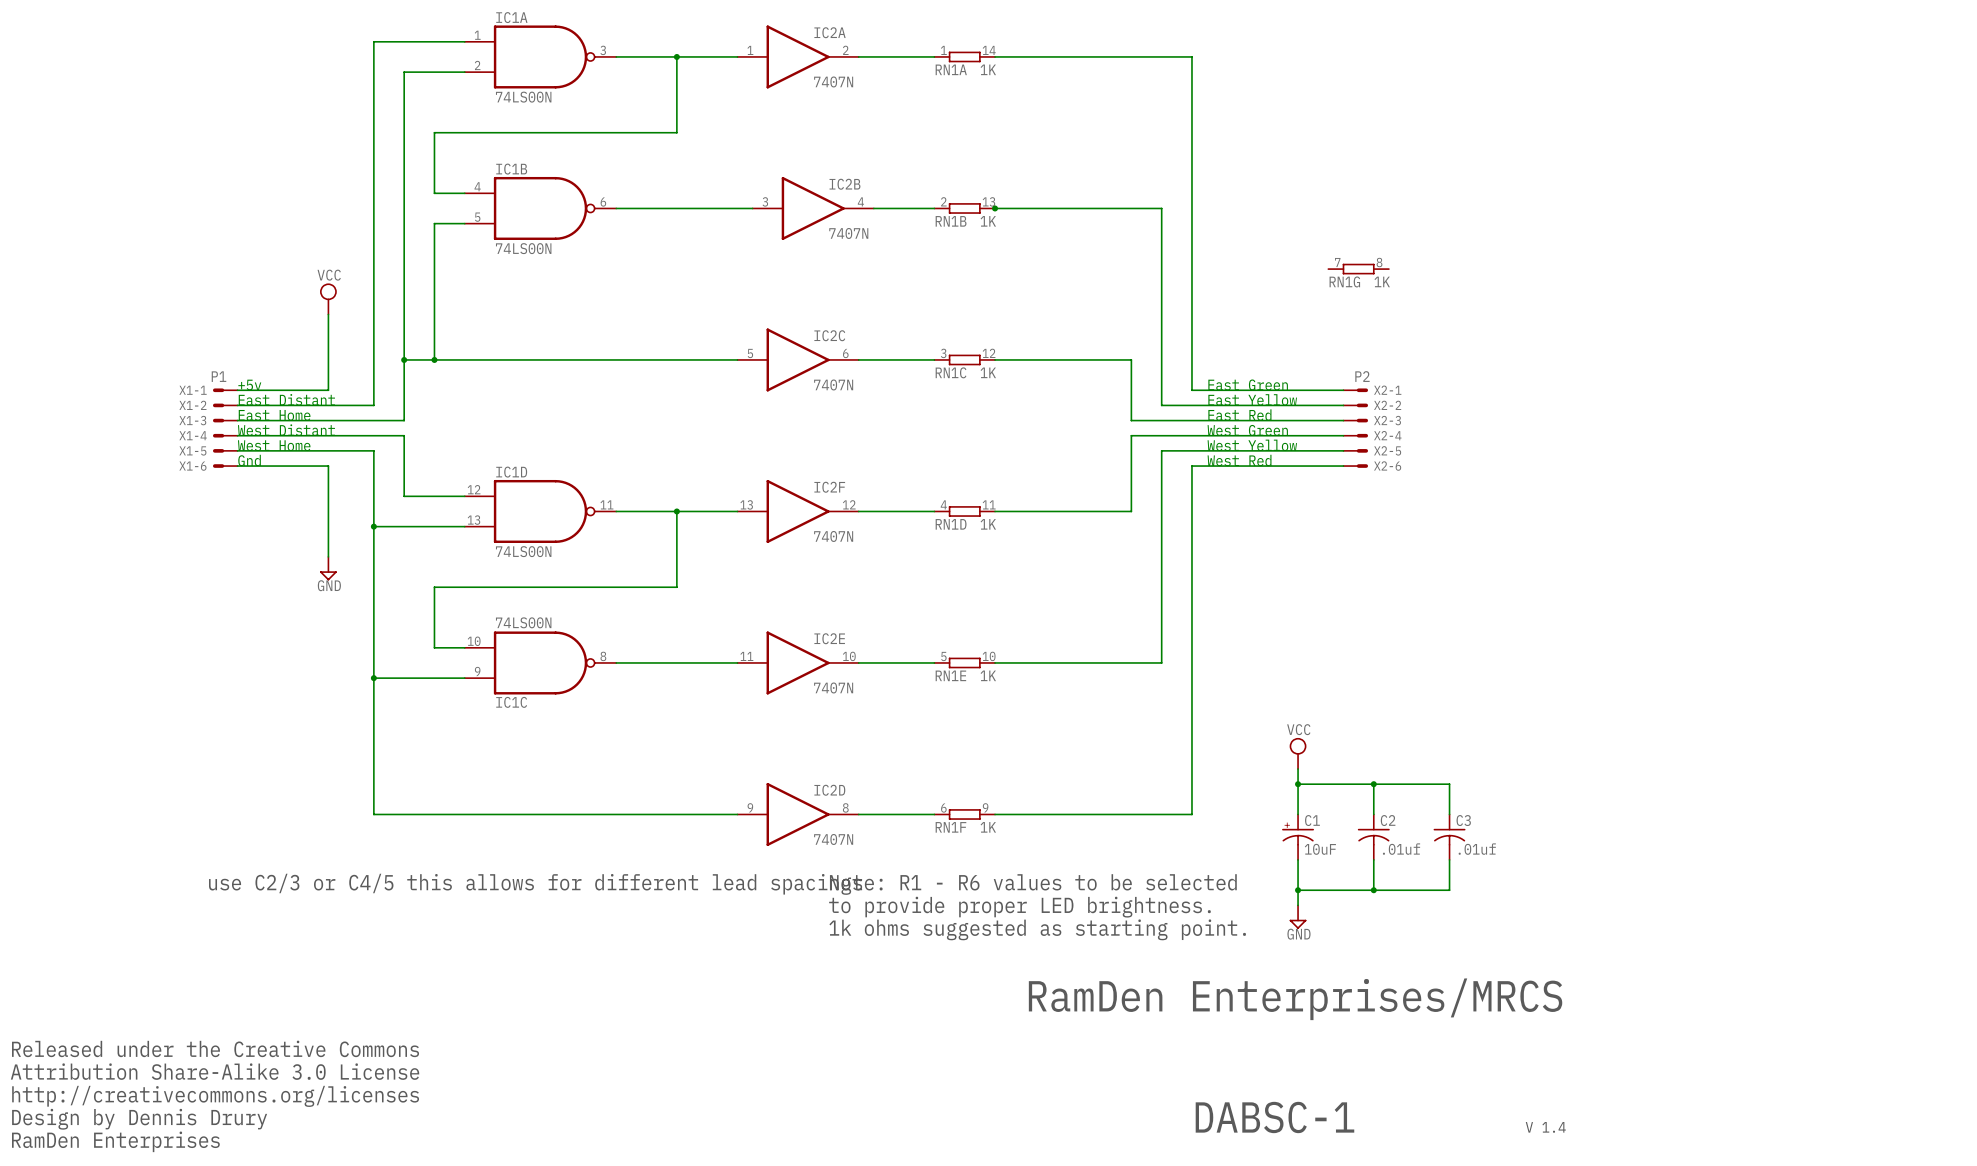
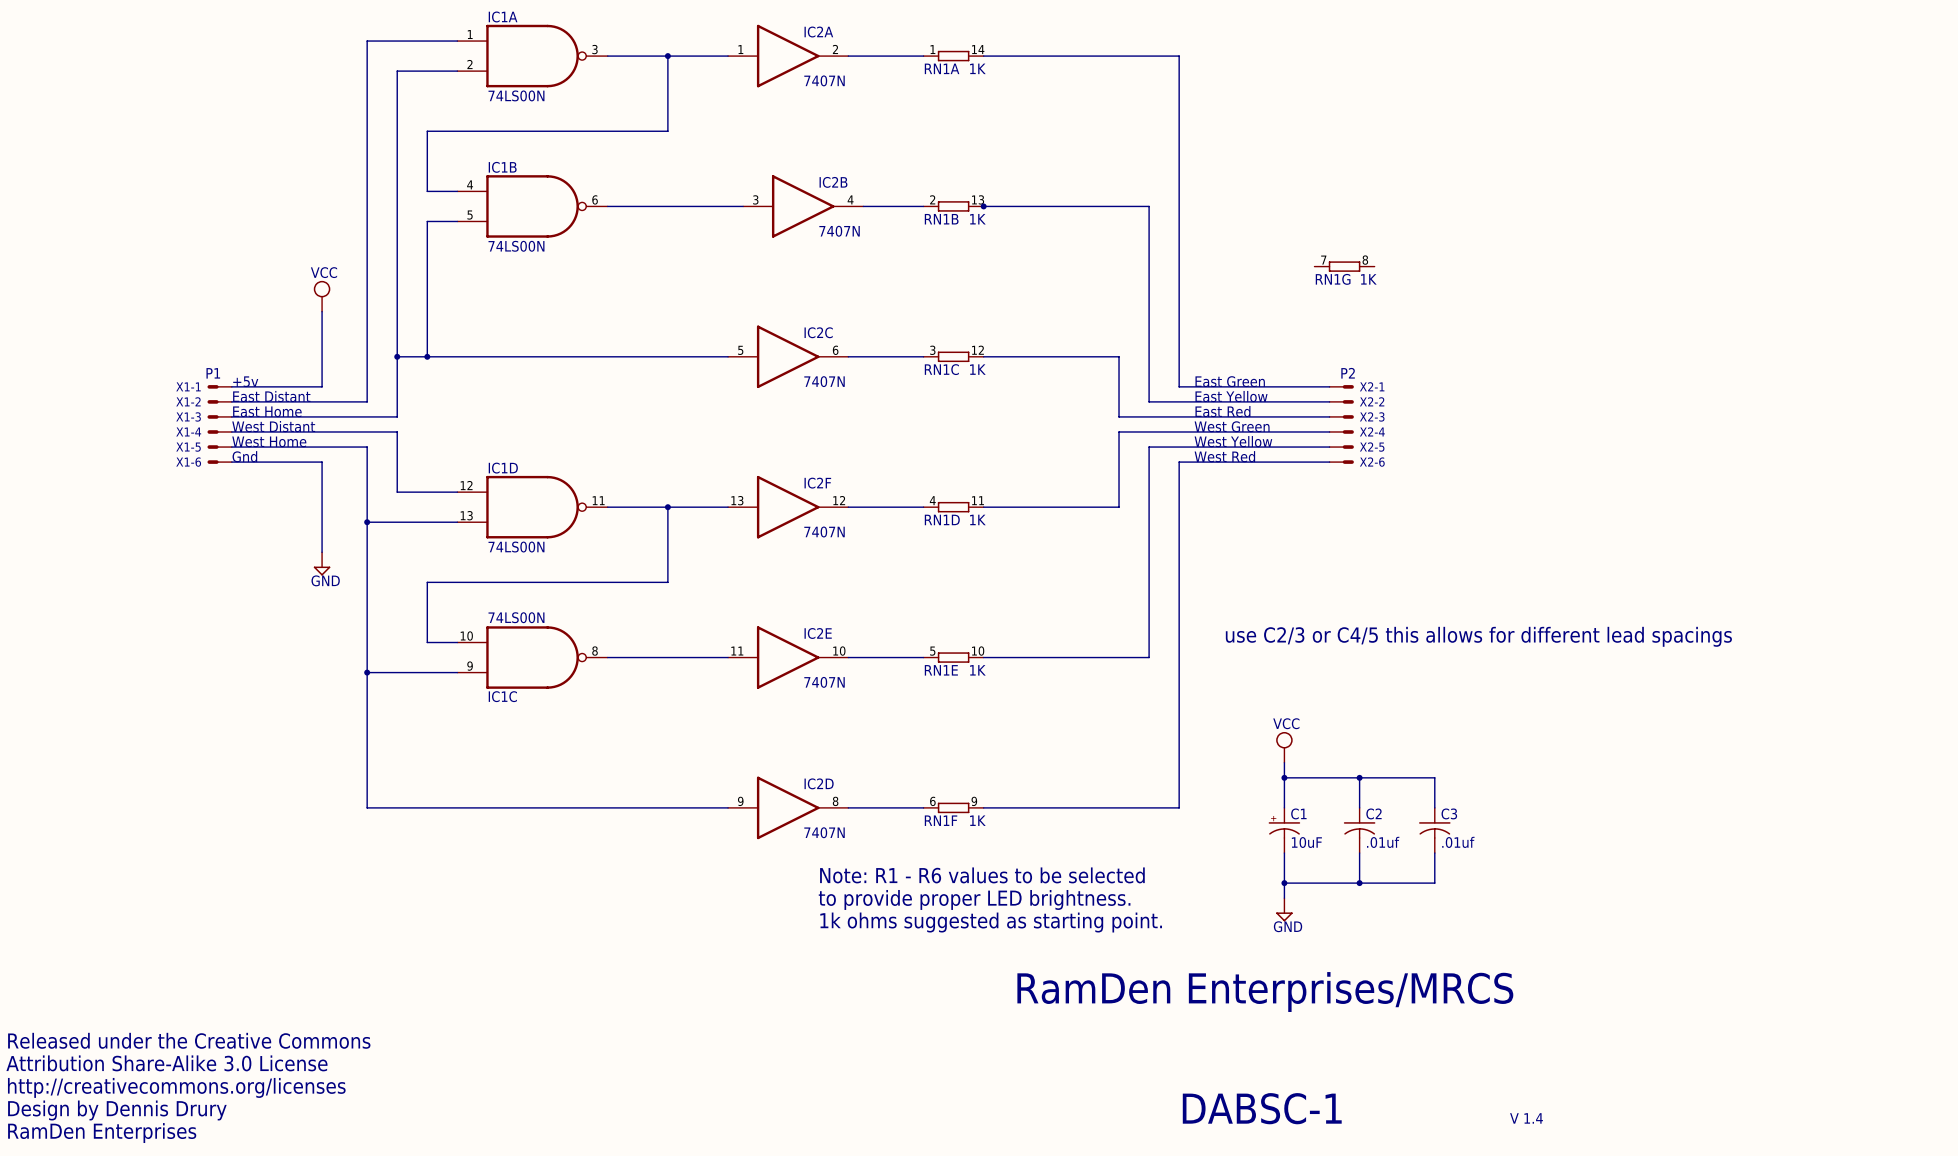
text: none -> use C2/3 or C4/5 this allows for different lead spacings (1478, 636)
text: use C2/3 or C4/5 this allows for different lead spacings (535, 884) -> none

